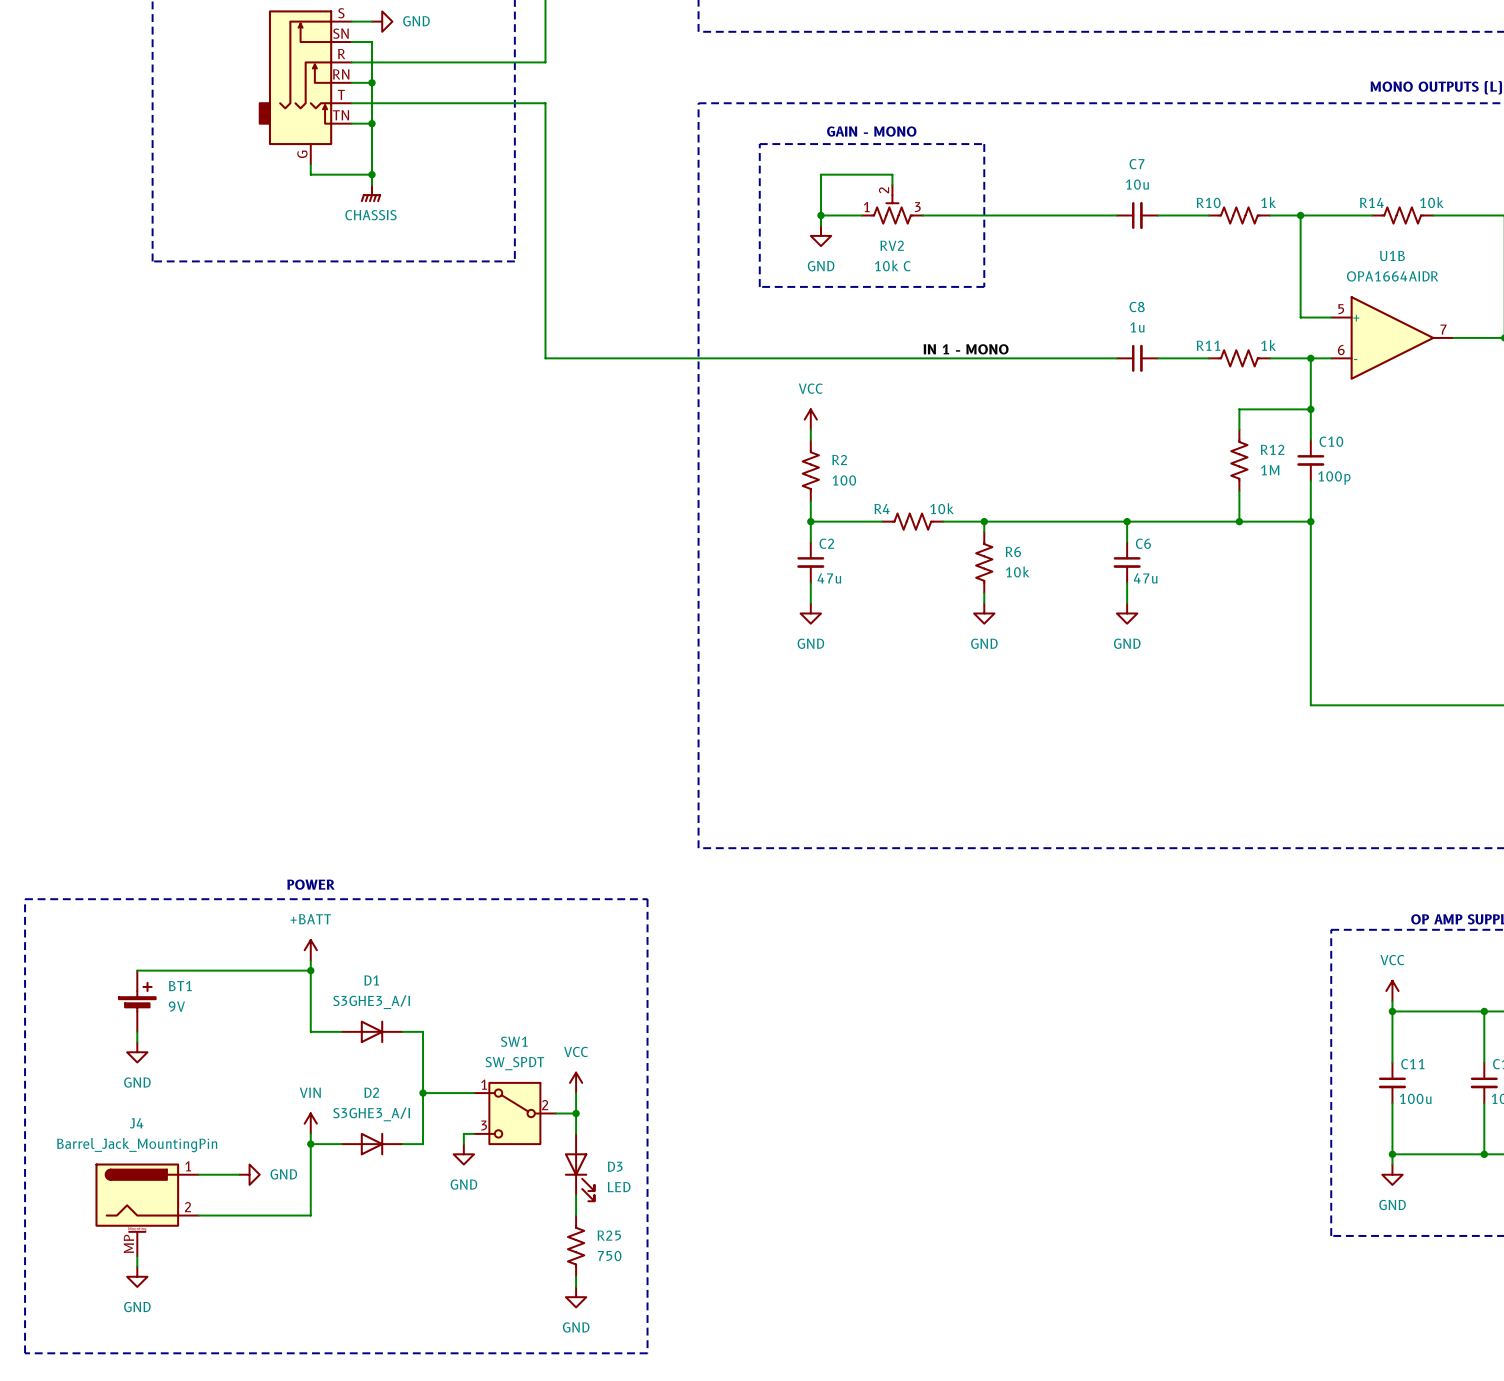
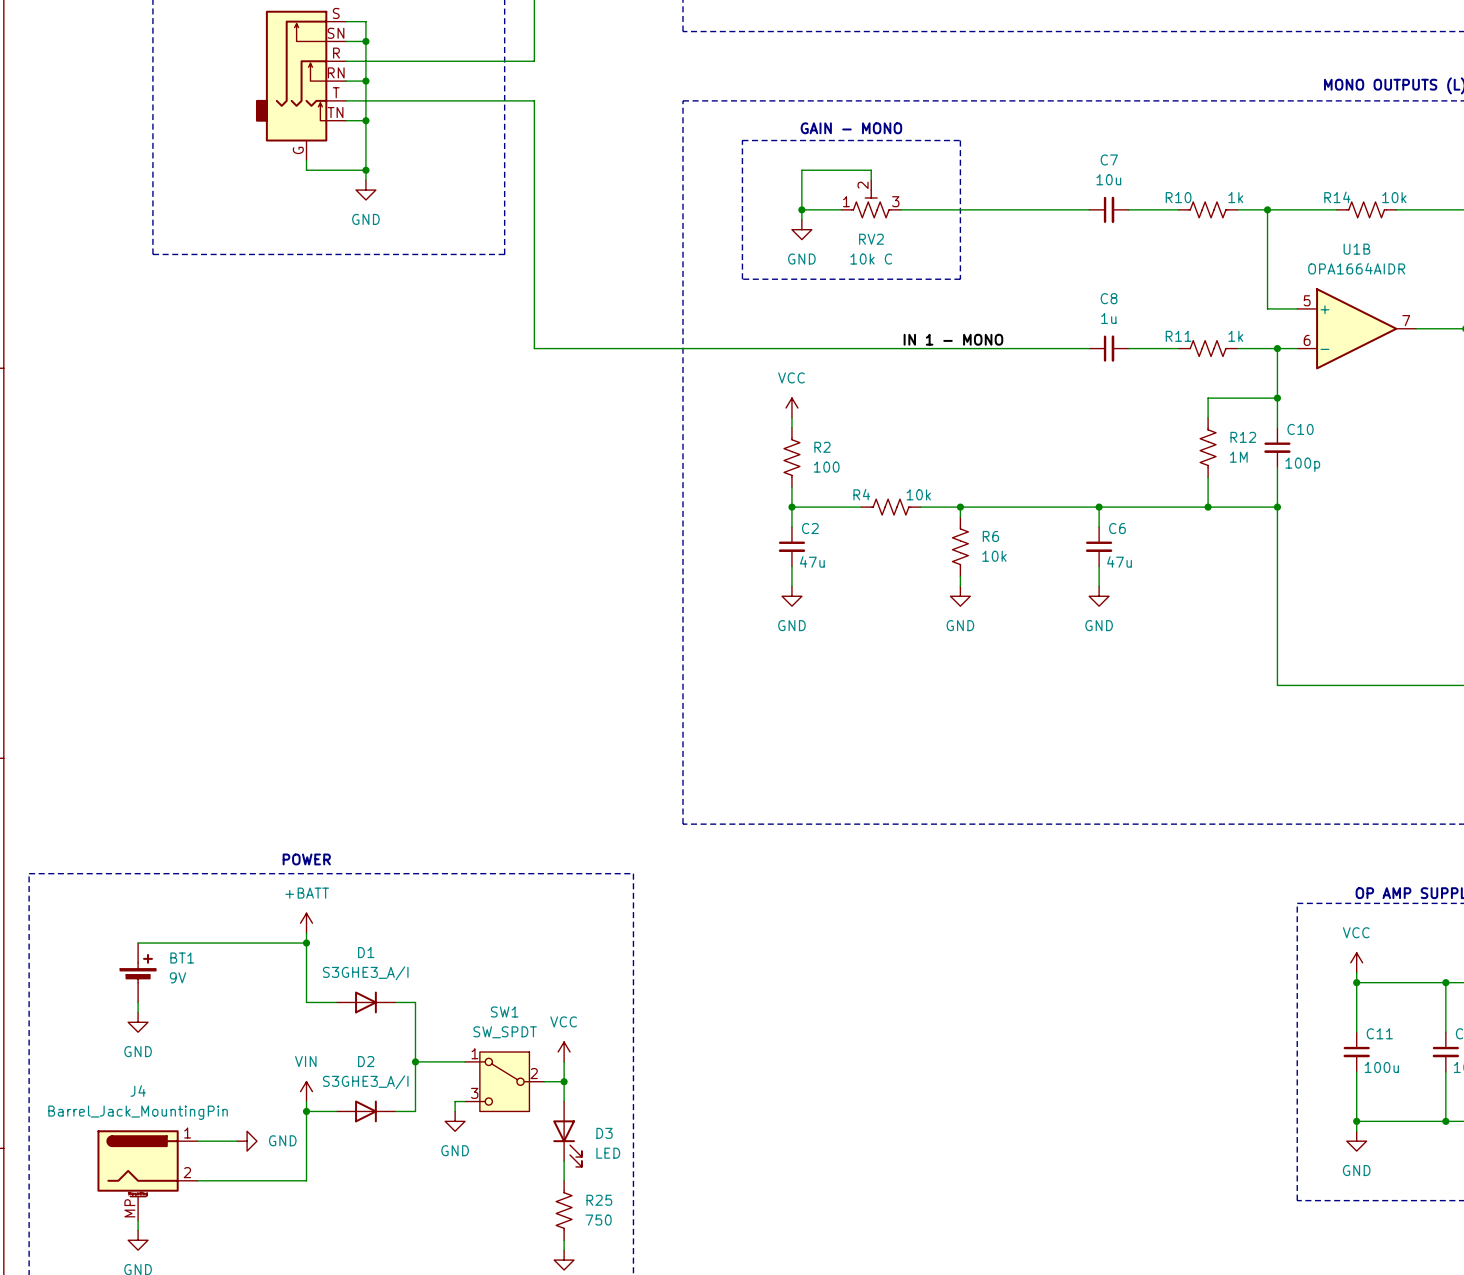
wire: none -> (365, 21) (365, 41)
power symbol: GND (382, 21) -> none
junction: none -> (365, 41)
power symbol: CHASSIS (370, 193) -> GND (365, 190)

